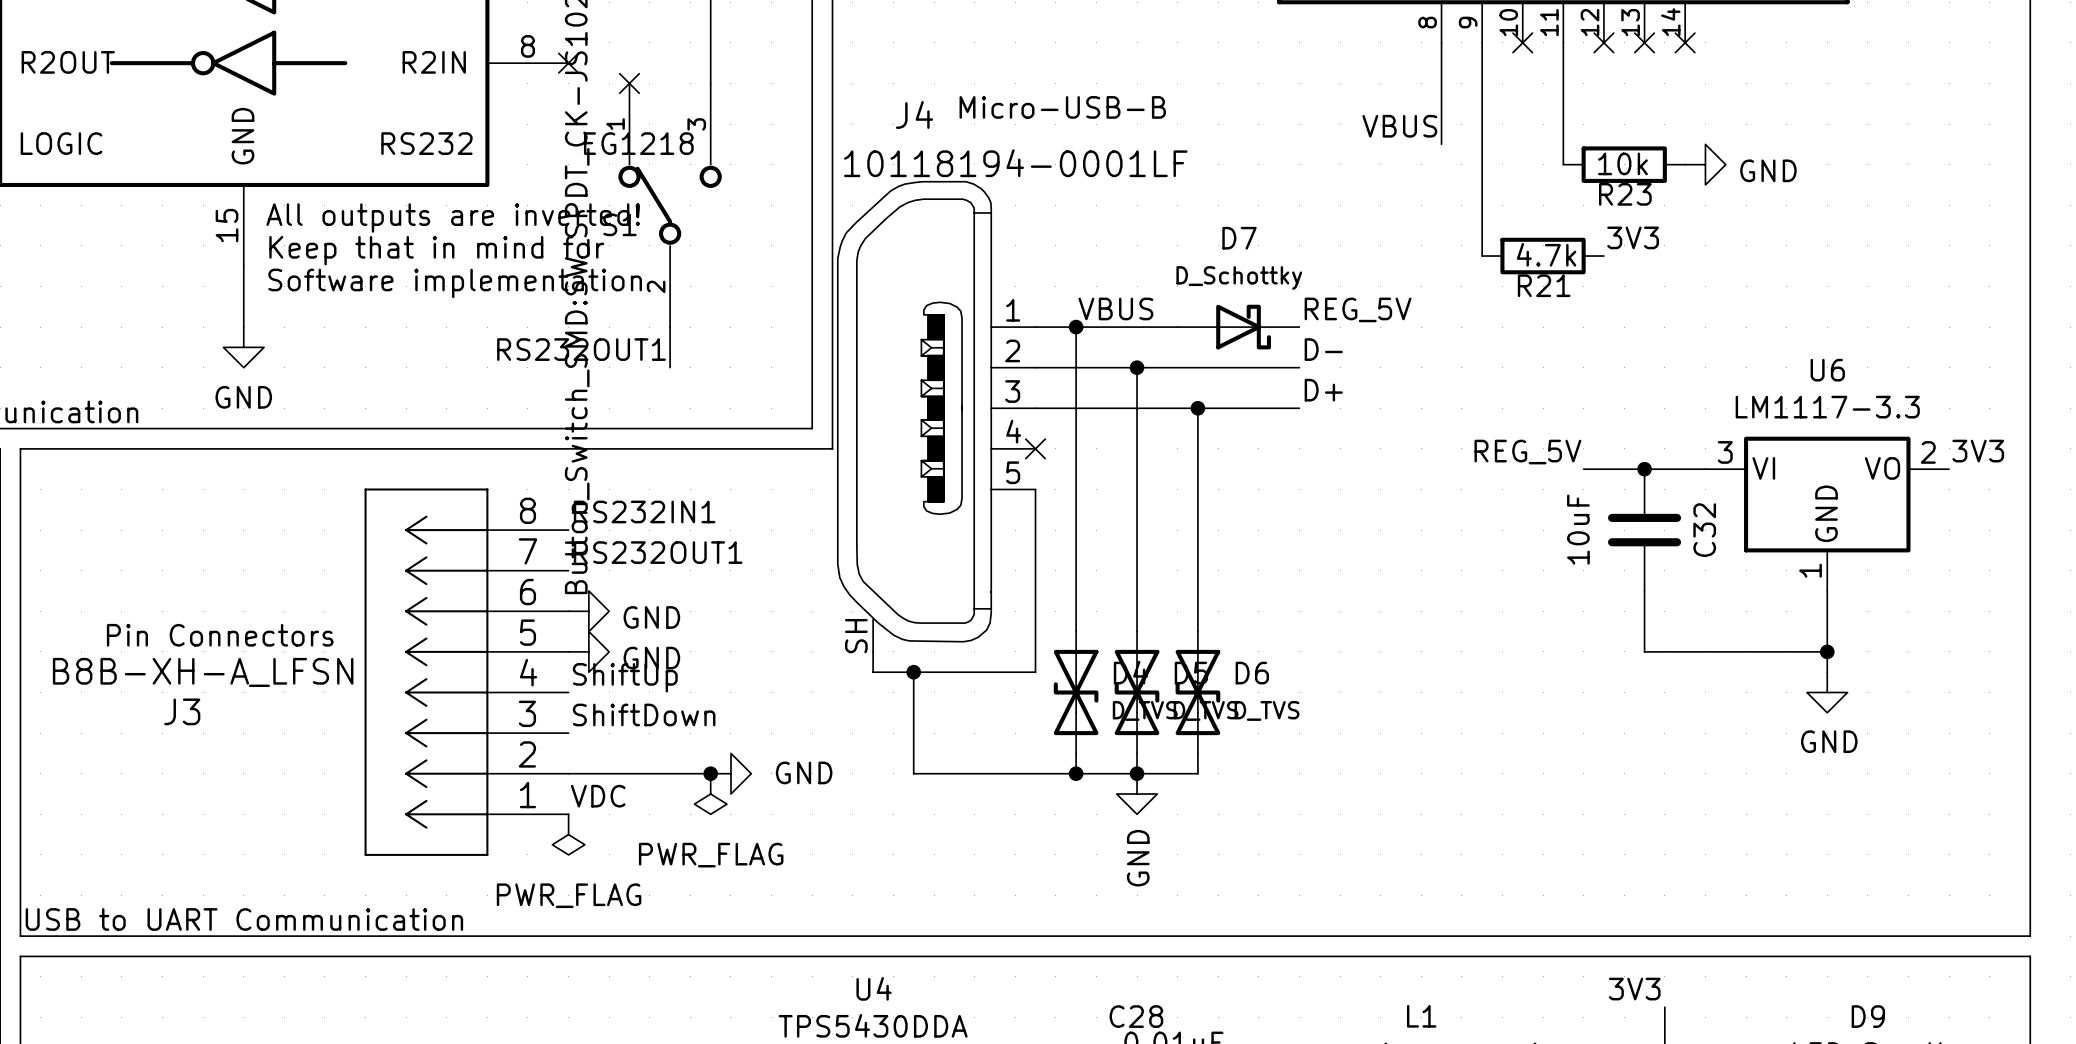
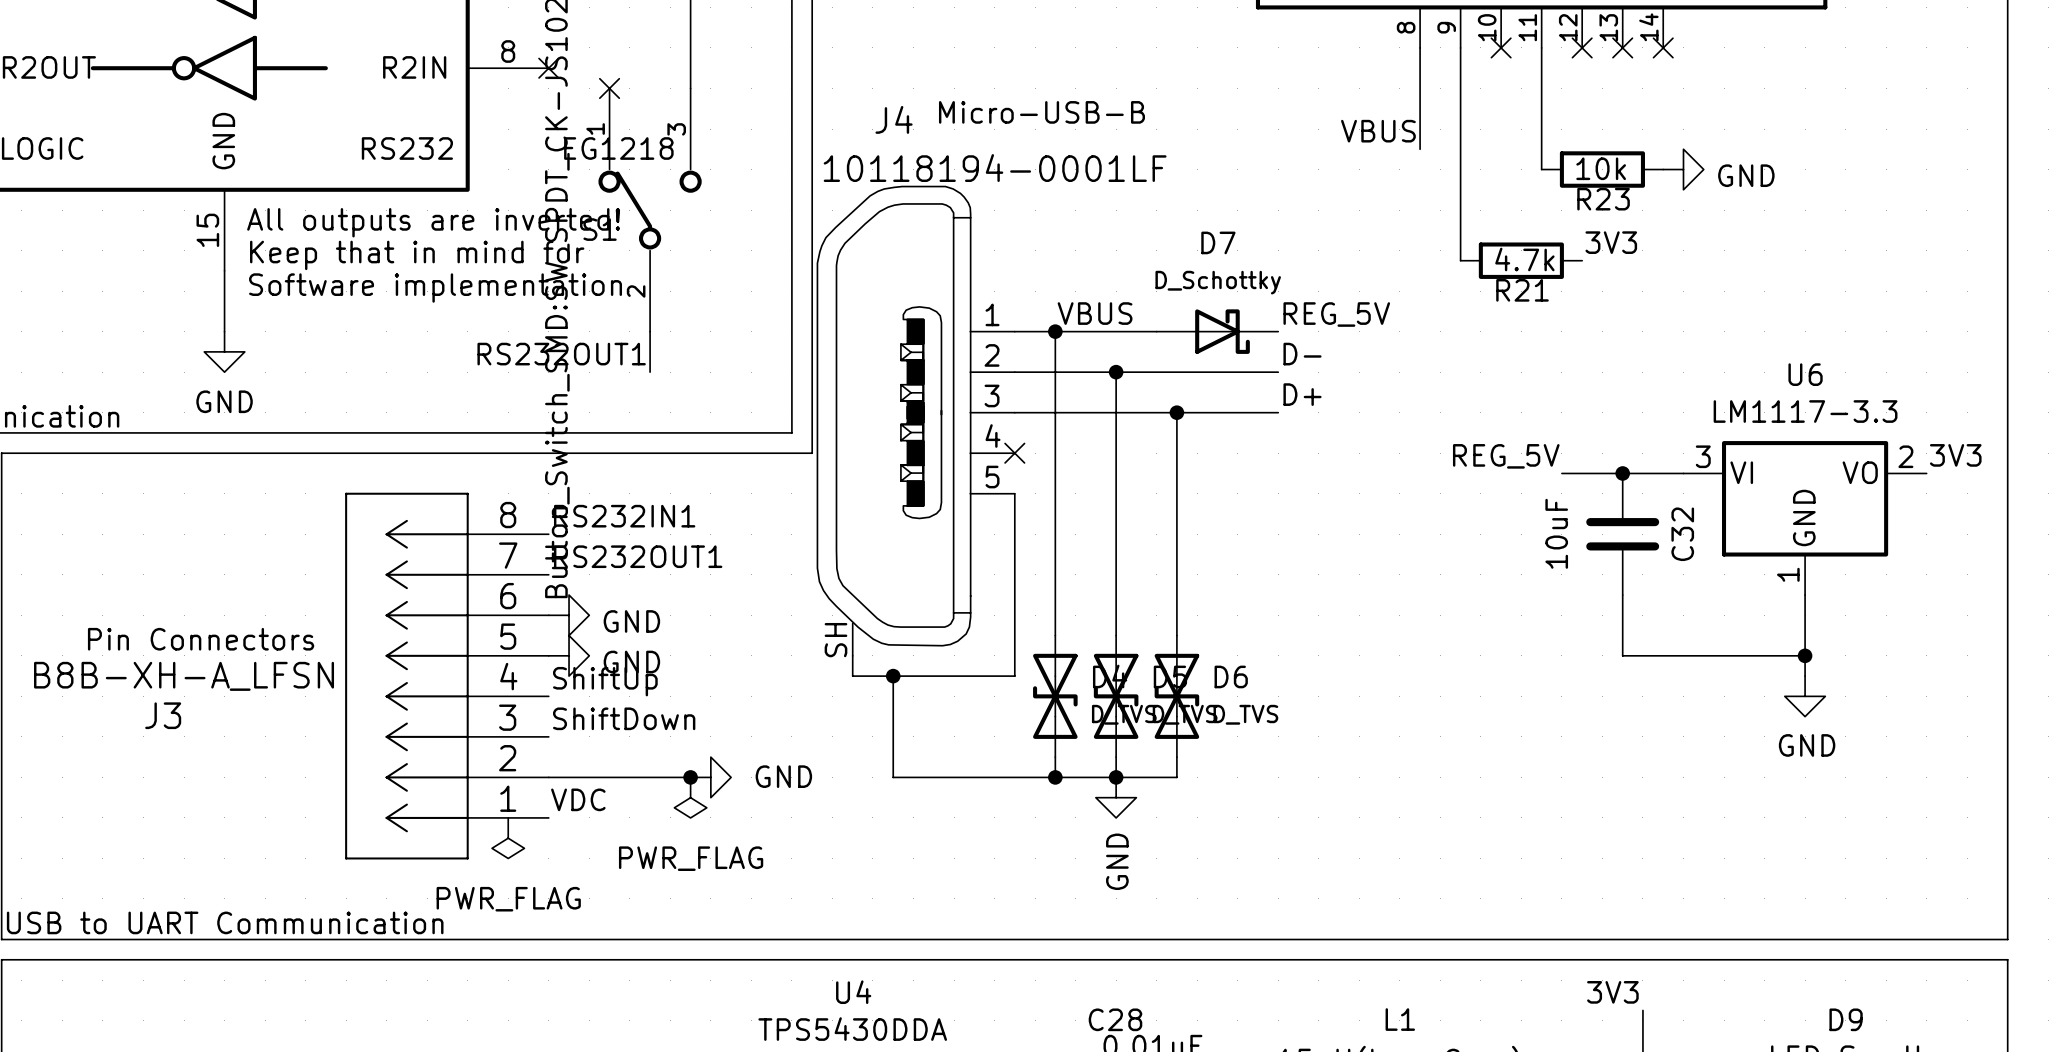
power symbol position: PWR_FLAG (568, 834) -> PWR_FLAG (508, 838)

